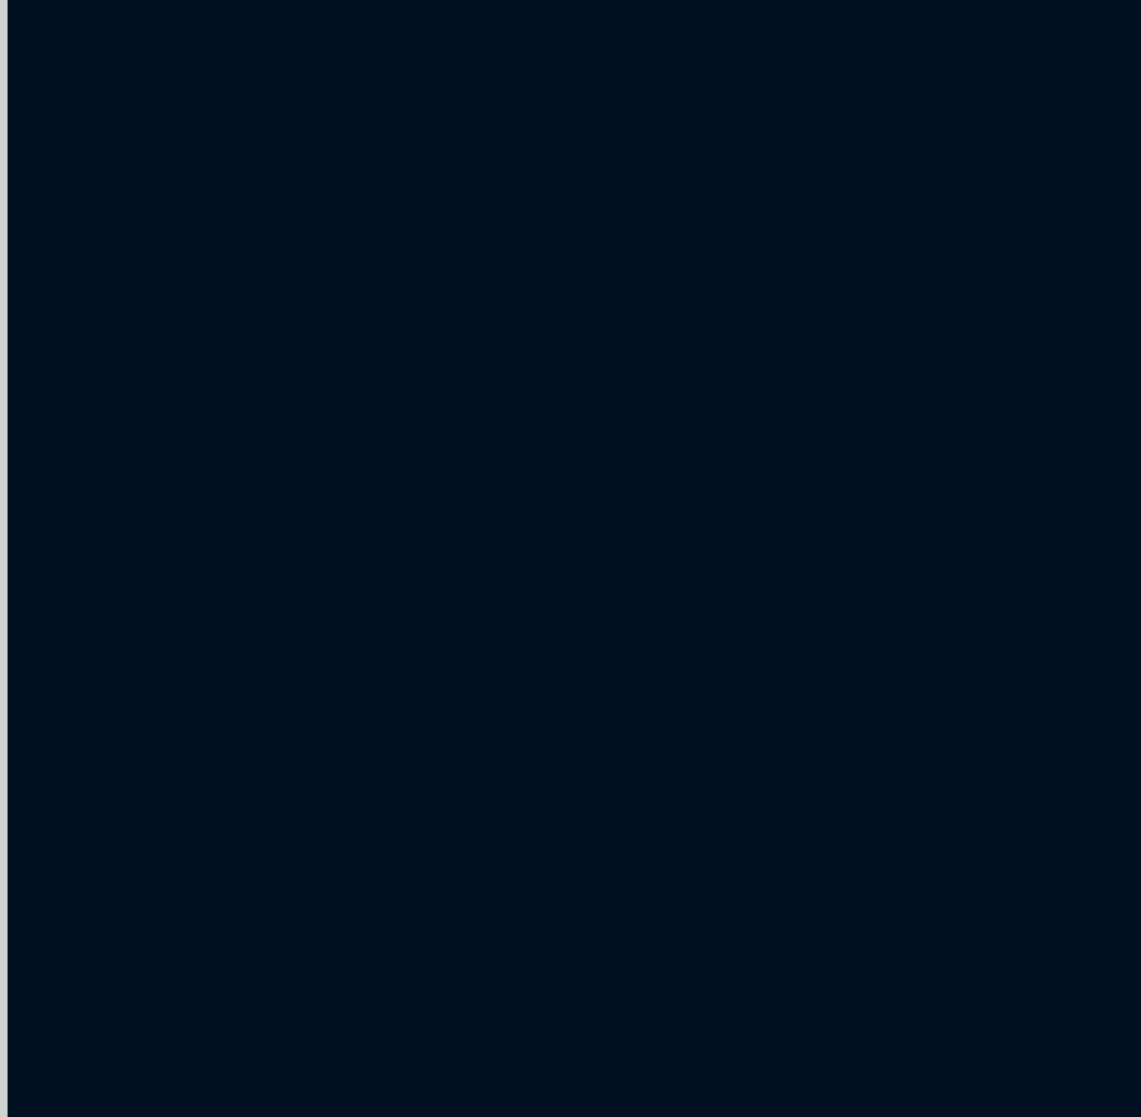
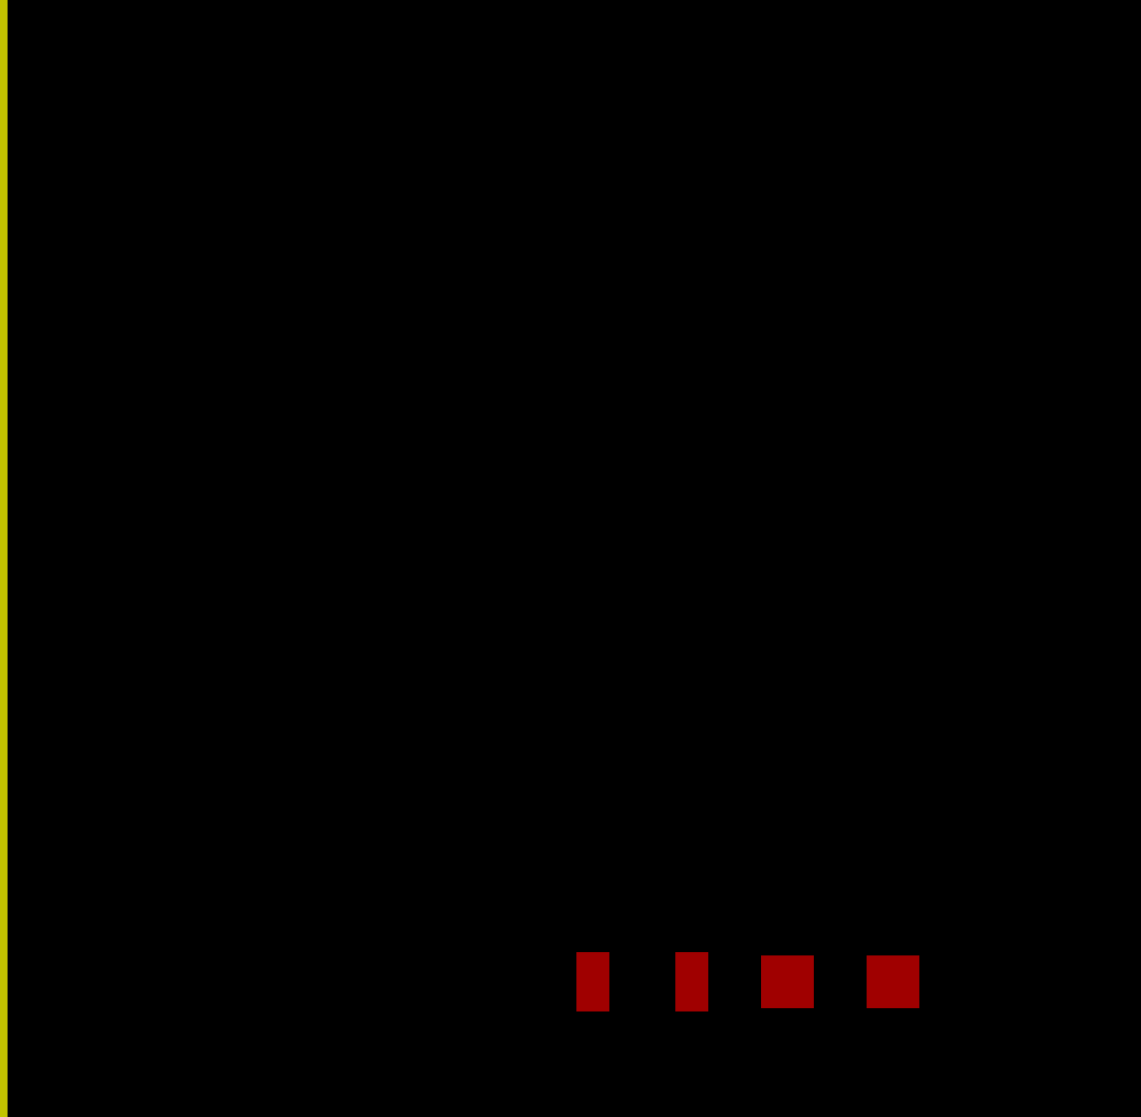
part: none -> (642, 981)
part: none -> (840, 981)

